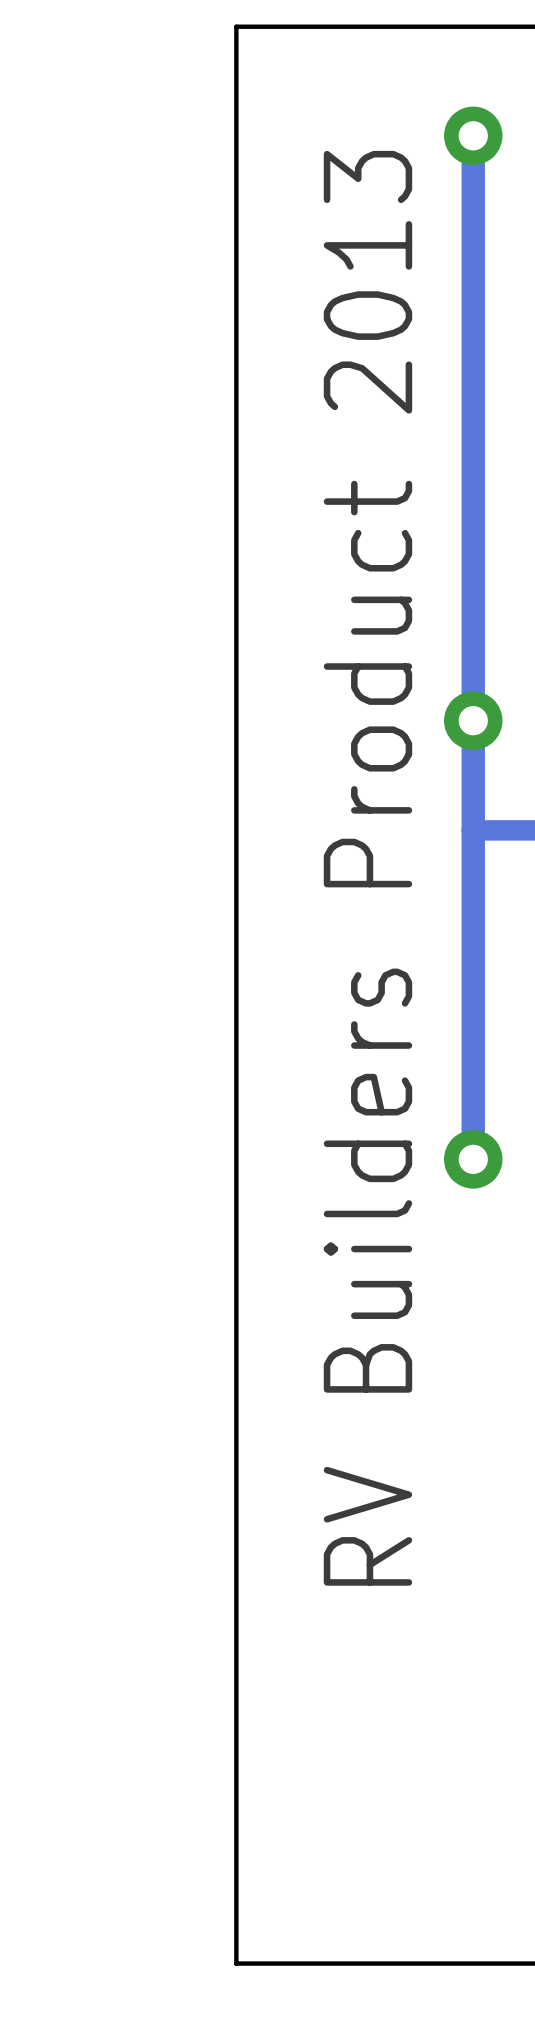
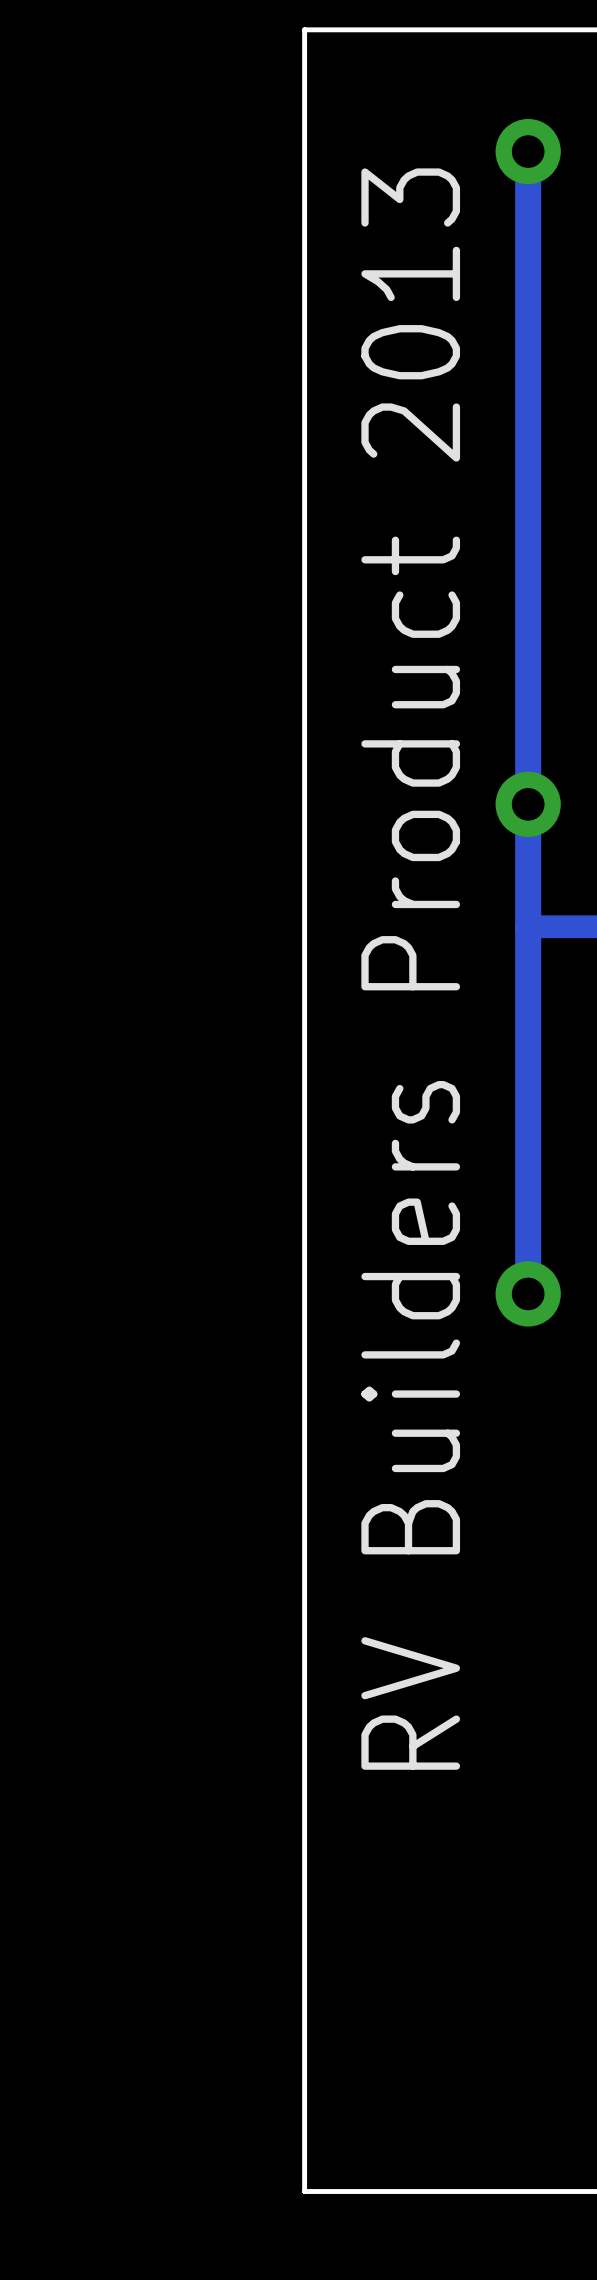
board edge: (272, 26) (236, 26) (236, 1963) (272, 1963) -> (304, 29) (304, 2191)

